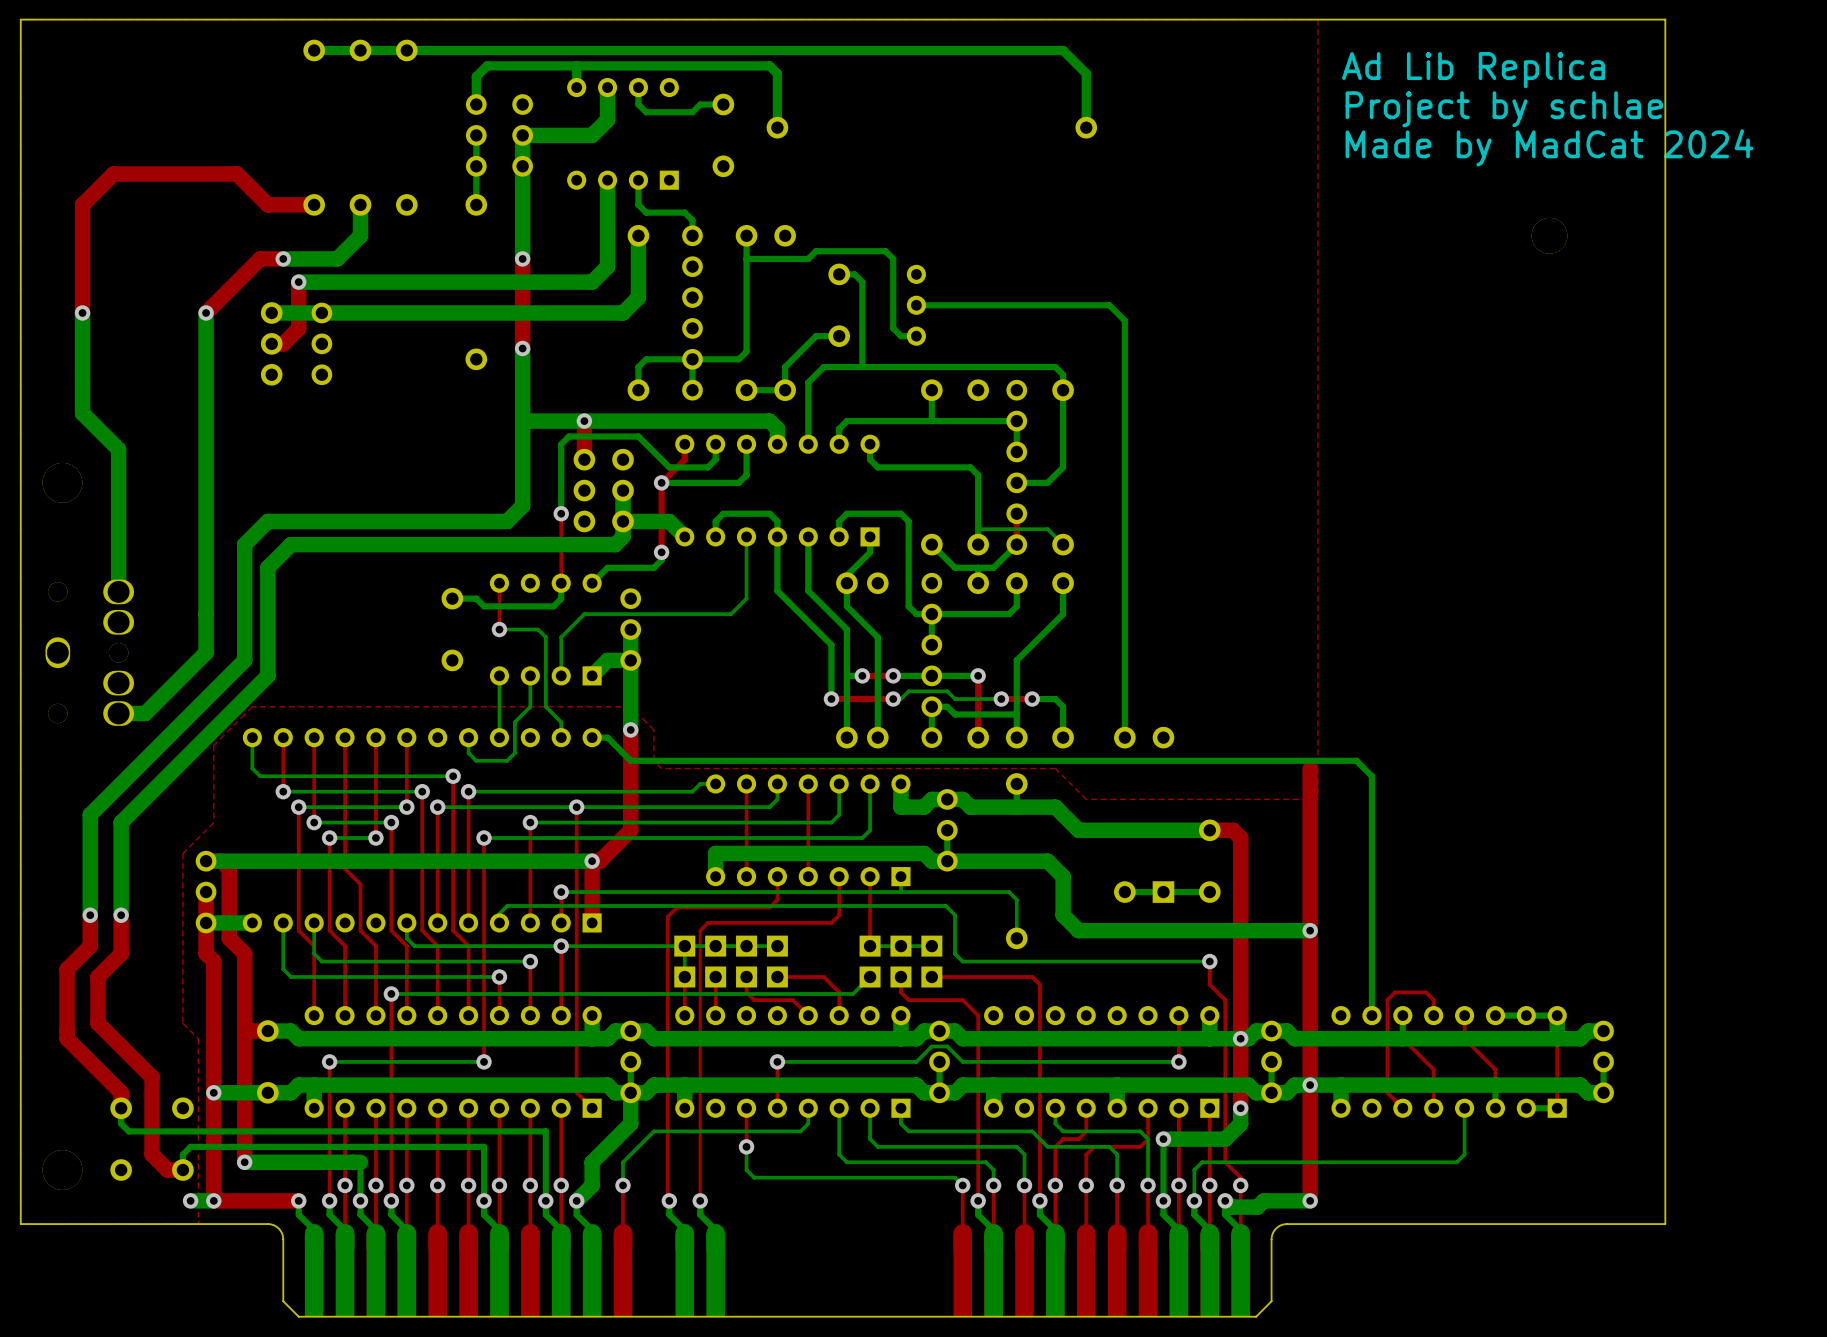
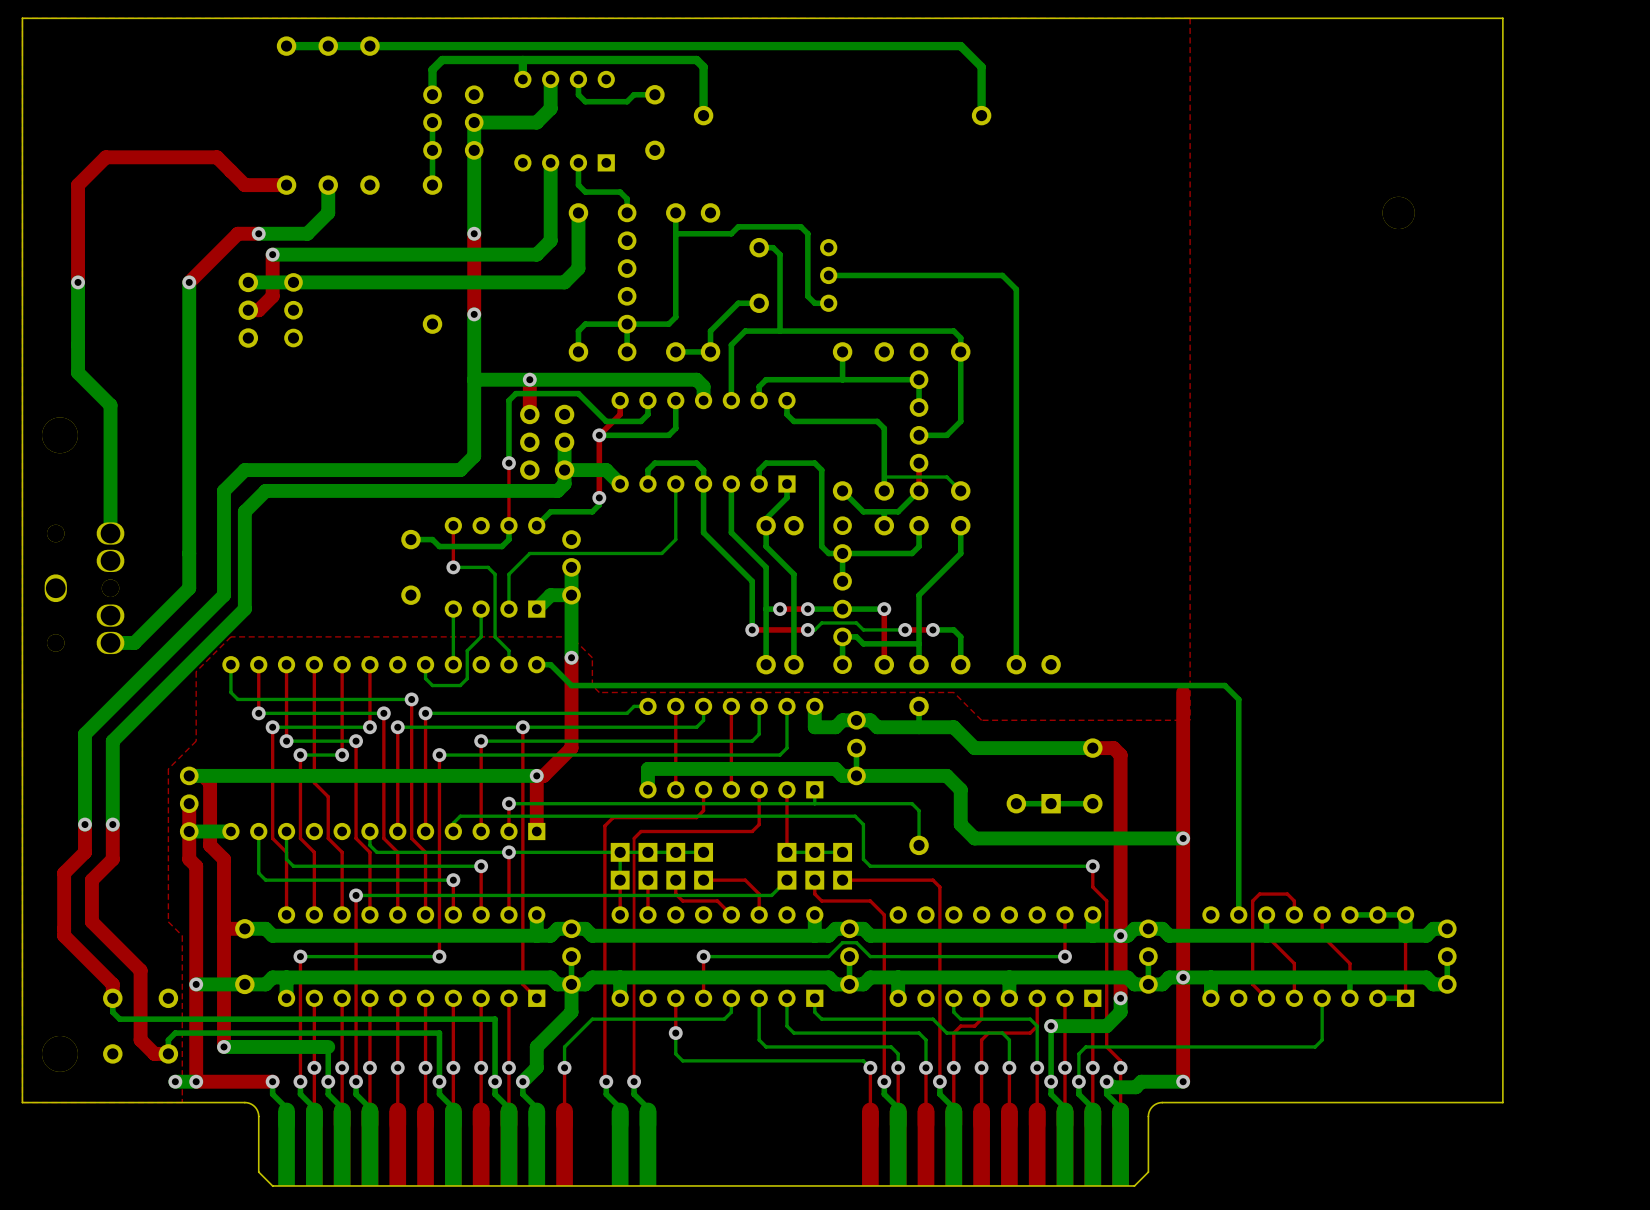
text: Ad Lib Replica (1473, 70) -> none
text: Project by schlae (1504, 109) -> none
text: Made by MadCat 2024 (1549, 147) -> none

